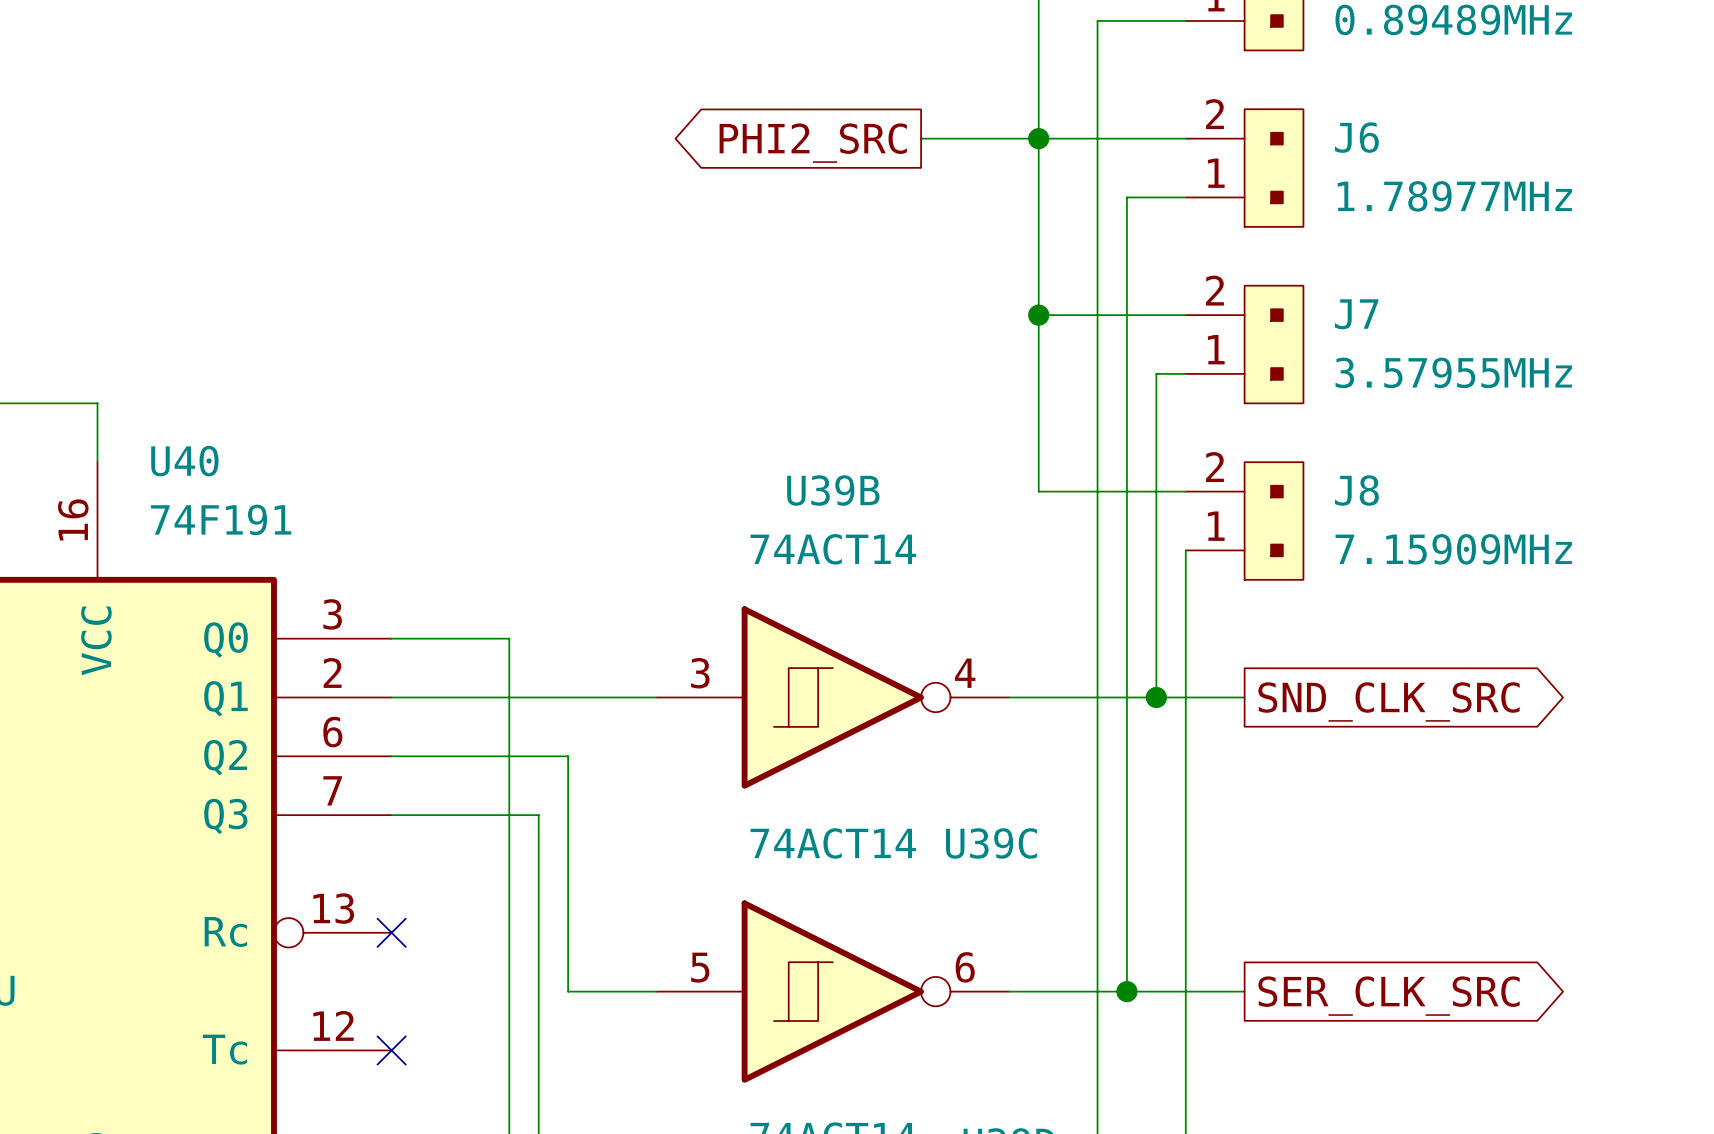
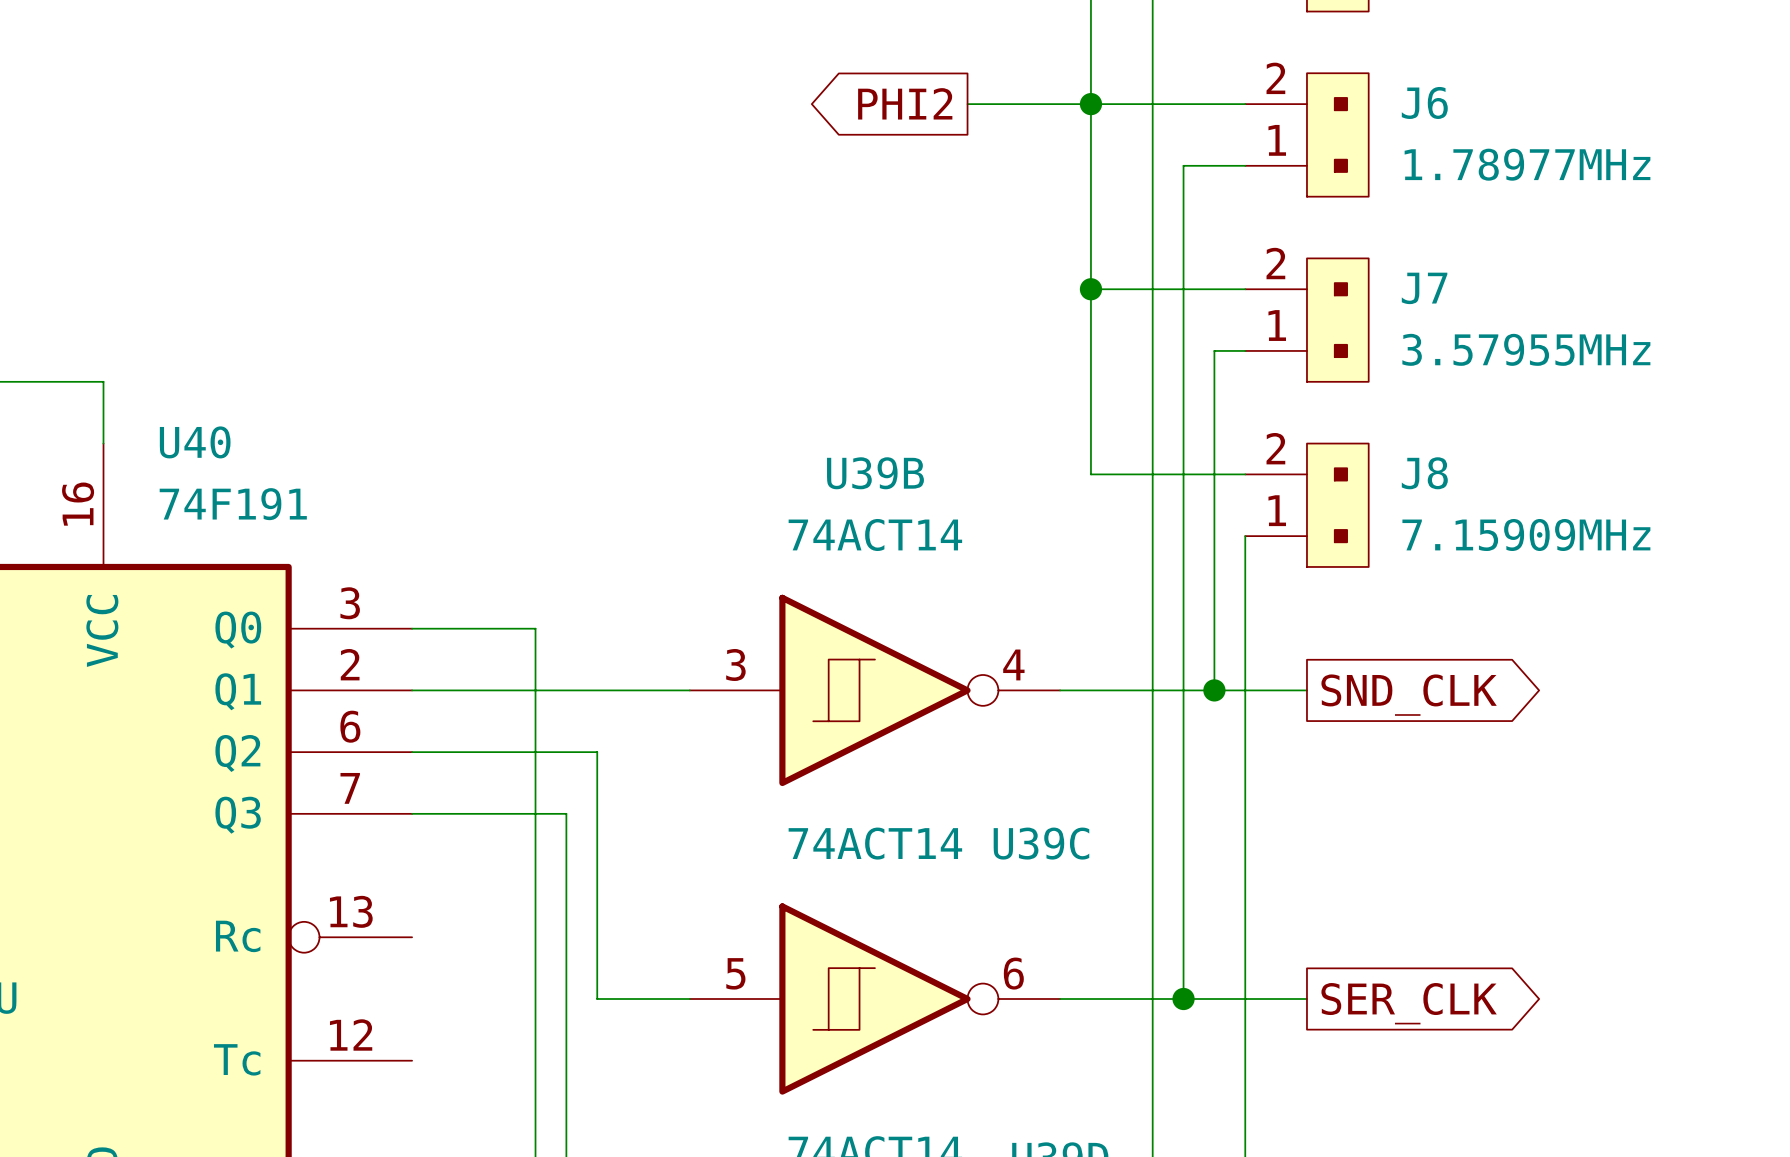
global label: PHI2_SRC (813, 143) -> PHI2 (905, 103)
global label: SND_CLK_SRC (1389, 701) -> SND_CLK (1409, 695)
no-connect mark: (391, 932) -> none
global label: SER_CLK_SRC (1389, 996) -> SER_CLK (1409, 1003)
no-connect mark: (391, 1050) -> none

